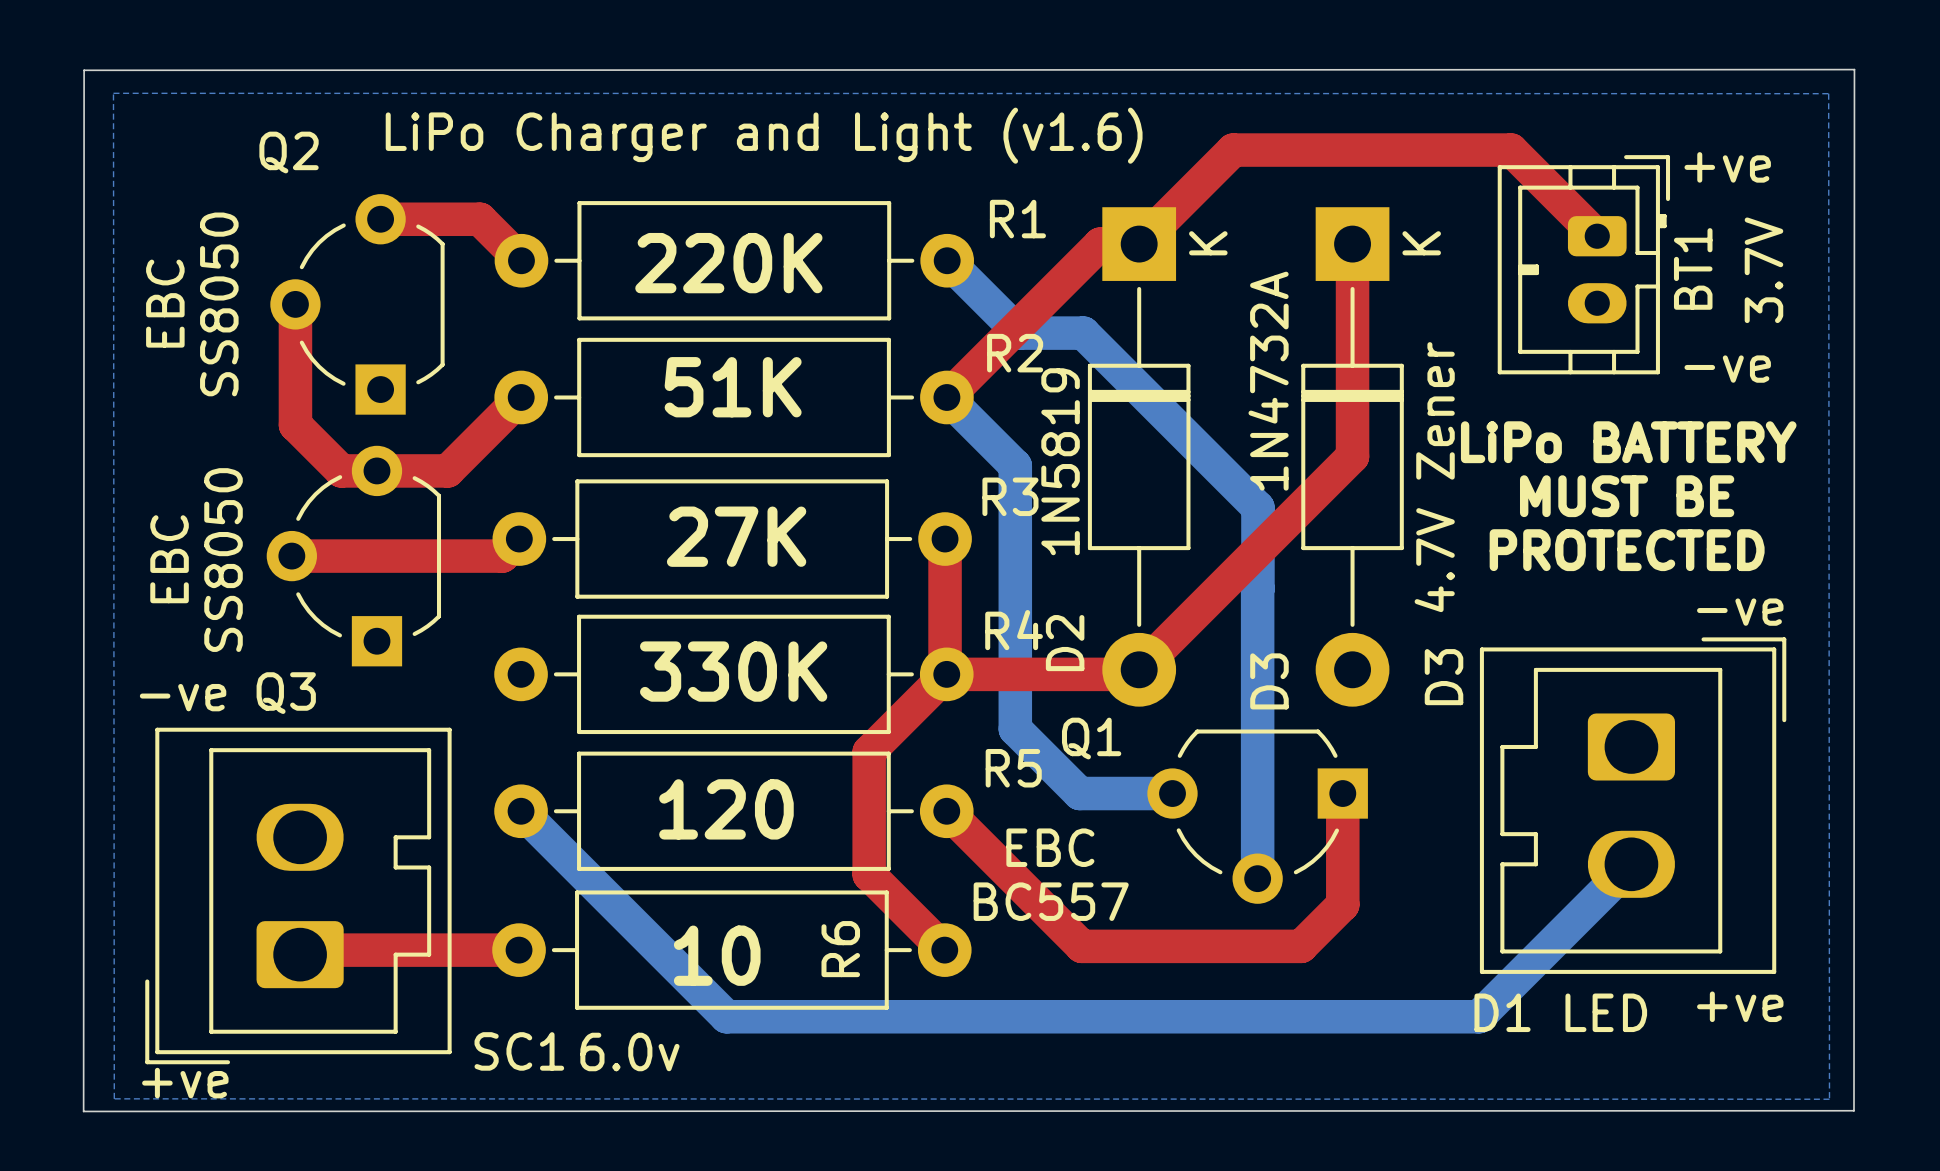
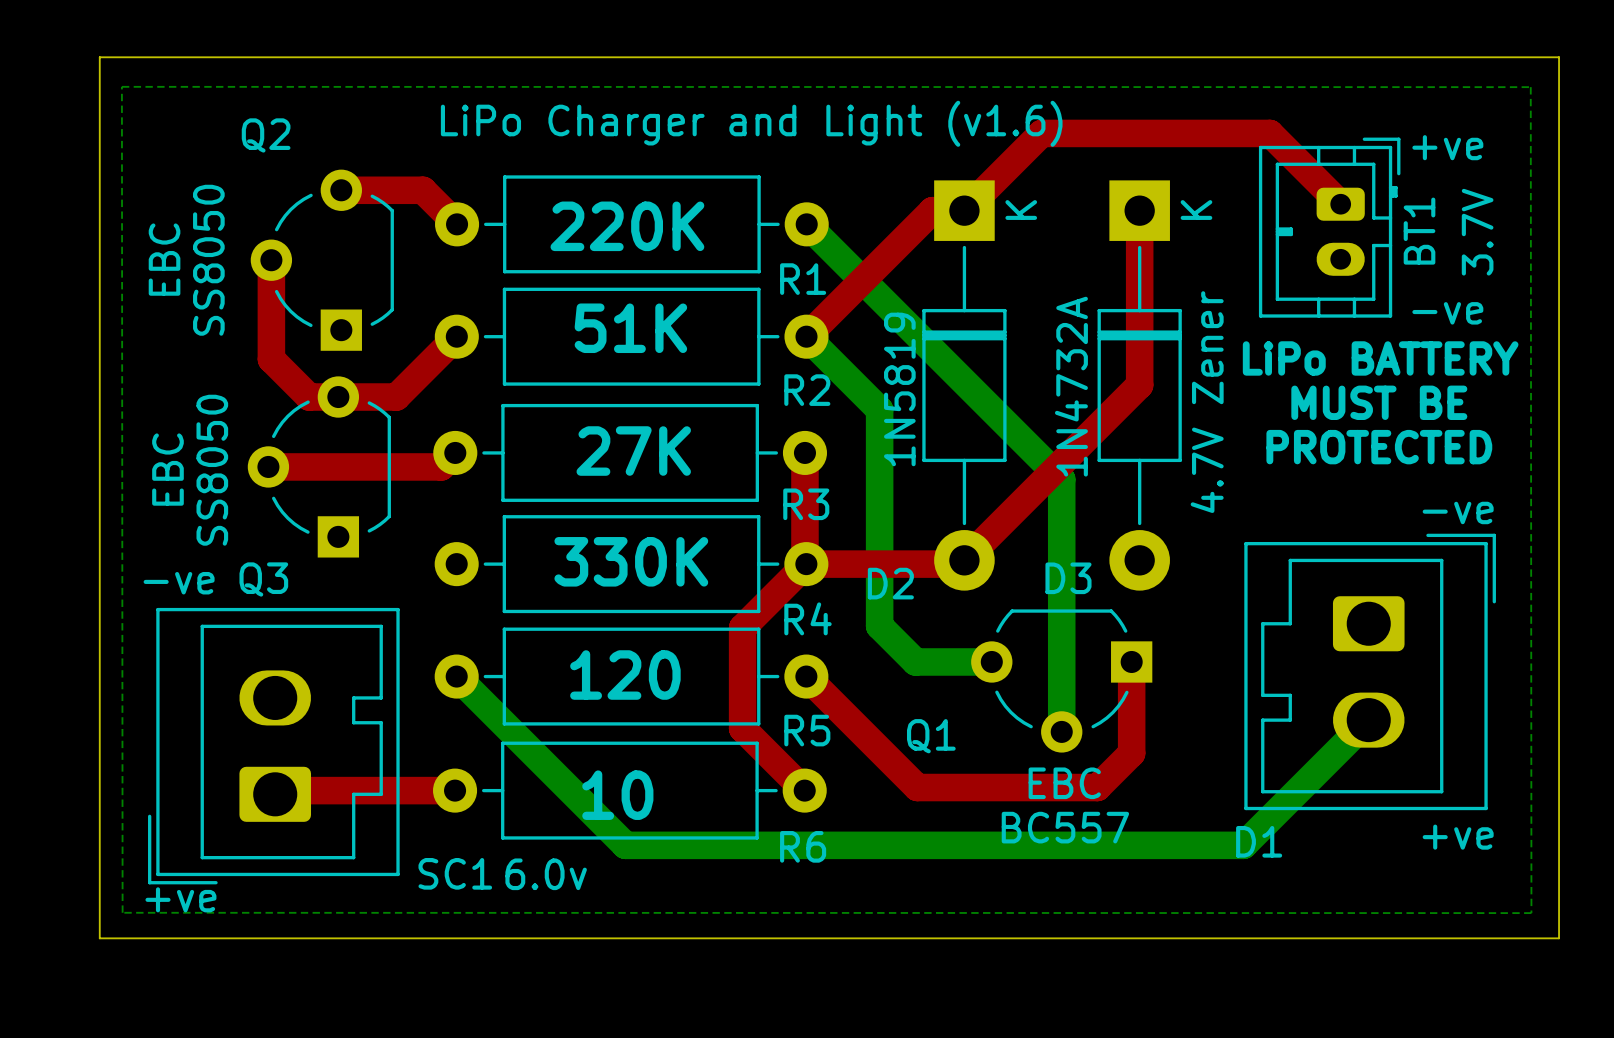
board edge: (1854, 69) (84, 70) (83, 1111) (1853, 1110) (1854, 69) -> (99, 57) (99, 938) (1559, 938) (1559, 57) (99, 57)
text position: LiPo Charger and Light (v1.6) (764, 135) -> LiPo Charger and Light (v1.6) (751, 123)
R1 name position: R1 (1017, 219) -> R1 (803, 279)
bottom track: (1019, 333) (1083, 333) (1257, 507) (1257, 588) -> (866, 283) (1061, 479) (1061, 493)
R2 name position: R2 (1015, 353) -> R2 (807, 390)
text position: 1N4732A (1268, 381) -> 1N4732A (1071, 386)
text position: LiPo BATTERY (1628, 442) -> LiPo BATTERY (1380, 358)
bottom track: (1015, 465) (1015, 729) (1035, 749) -> (862, 392) (879, 409) (879, 626)
R3 name position: R3 (1010, 496) -> R3 (806, 504)
text position: MUST BE (1627, 496) -> MUST BE (1379, 402)
text position: PROTECTED (1627, 550) -> PROTECTED (1379, 447)
R4 name position: R4 (1014, 630) -> R4 (807, 618)
D2 name rotation: 0° (1065, 643) -> 90° clockwise (890, 583)
text: D3 (1444, 677) -> none
D3 name rotation: 0° (1269, 681) -> 90° clockwise (1068, 578)
Q1 name position: Q1 (1091, 738) -> Q1 (931, 736)
R5 name position: R5 (1013, 768) -> R5 (807, 730)
text position: EBC (1050, 847) -> EBC (1064, 783)
text position: BC557 (1051, 901) -> BC557 (1065, 827)
R6 name rotation: 0° (840, 949) -> 90° clockwise (803, 846)
R6 name position: R6 (840, 949) -> R6 (803, 846)
D1 LED name: D1 LED (1560, 1012) -> D1 (1259, 841)

